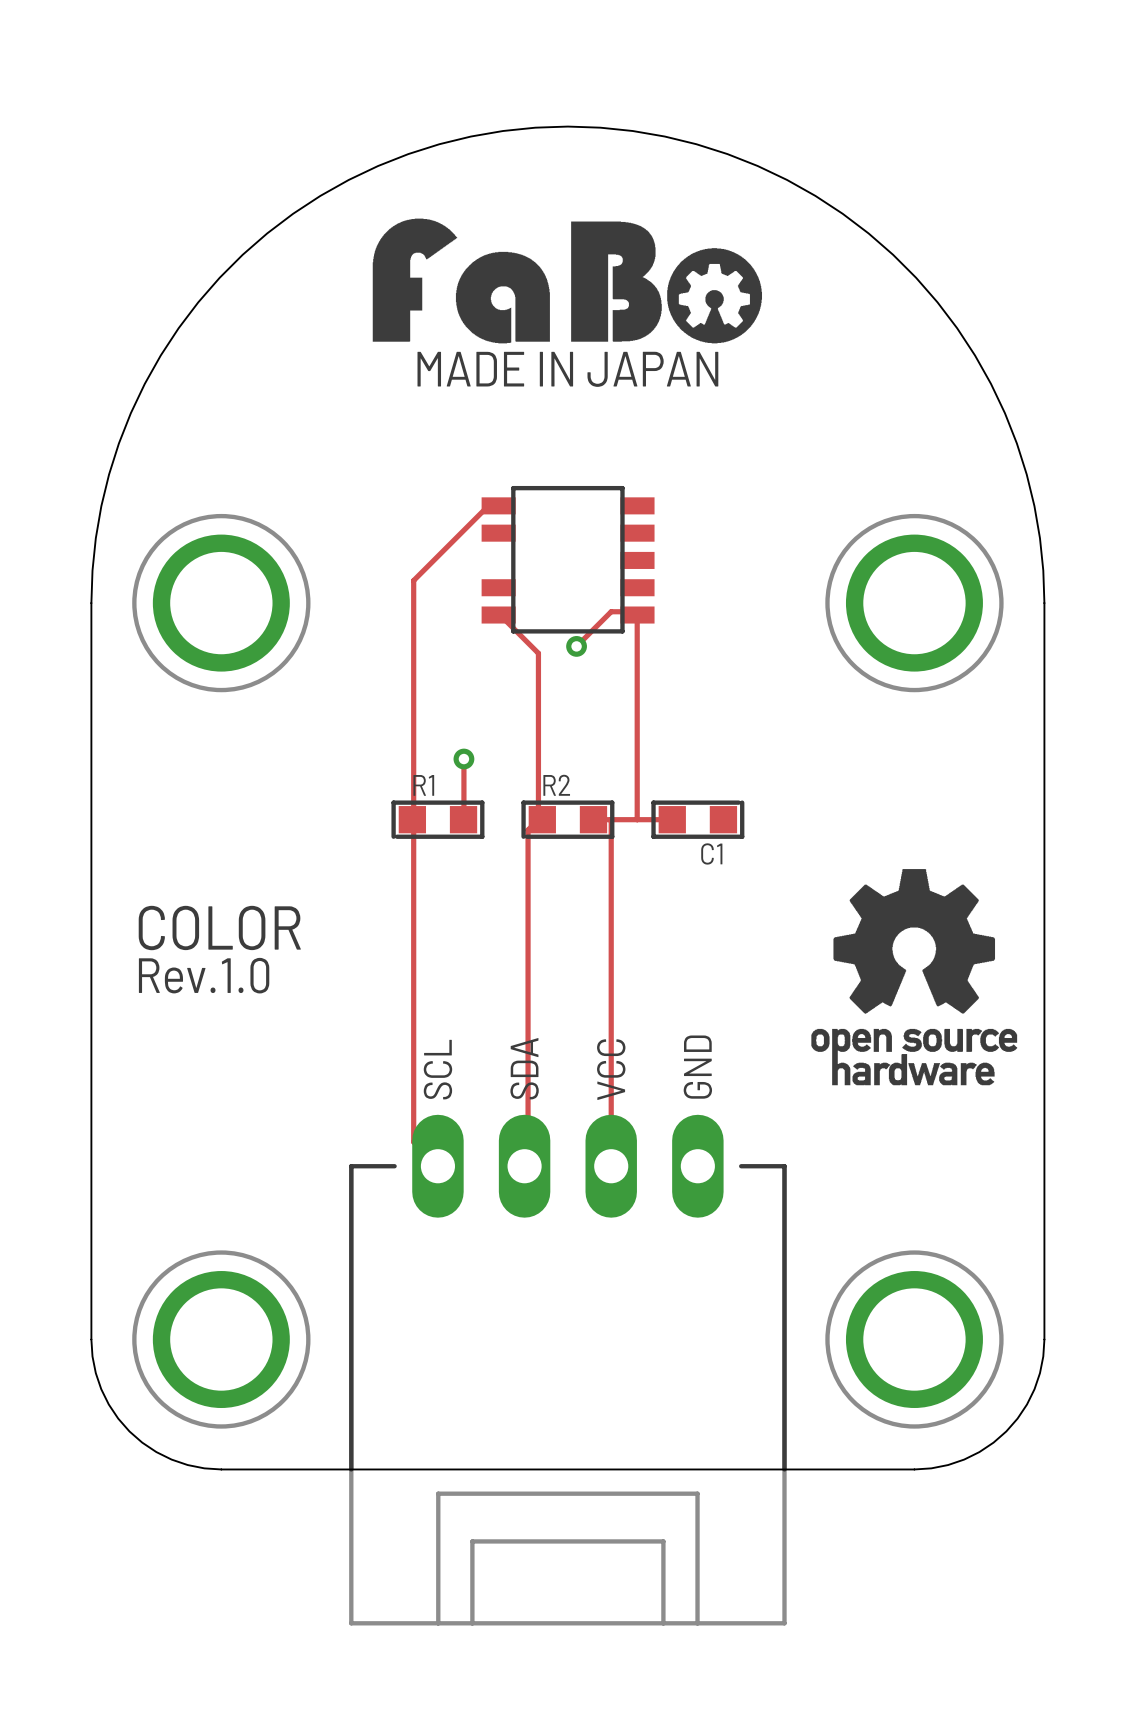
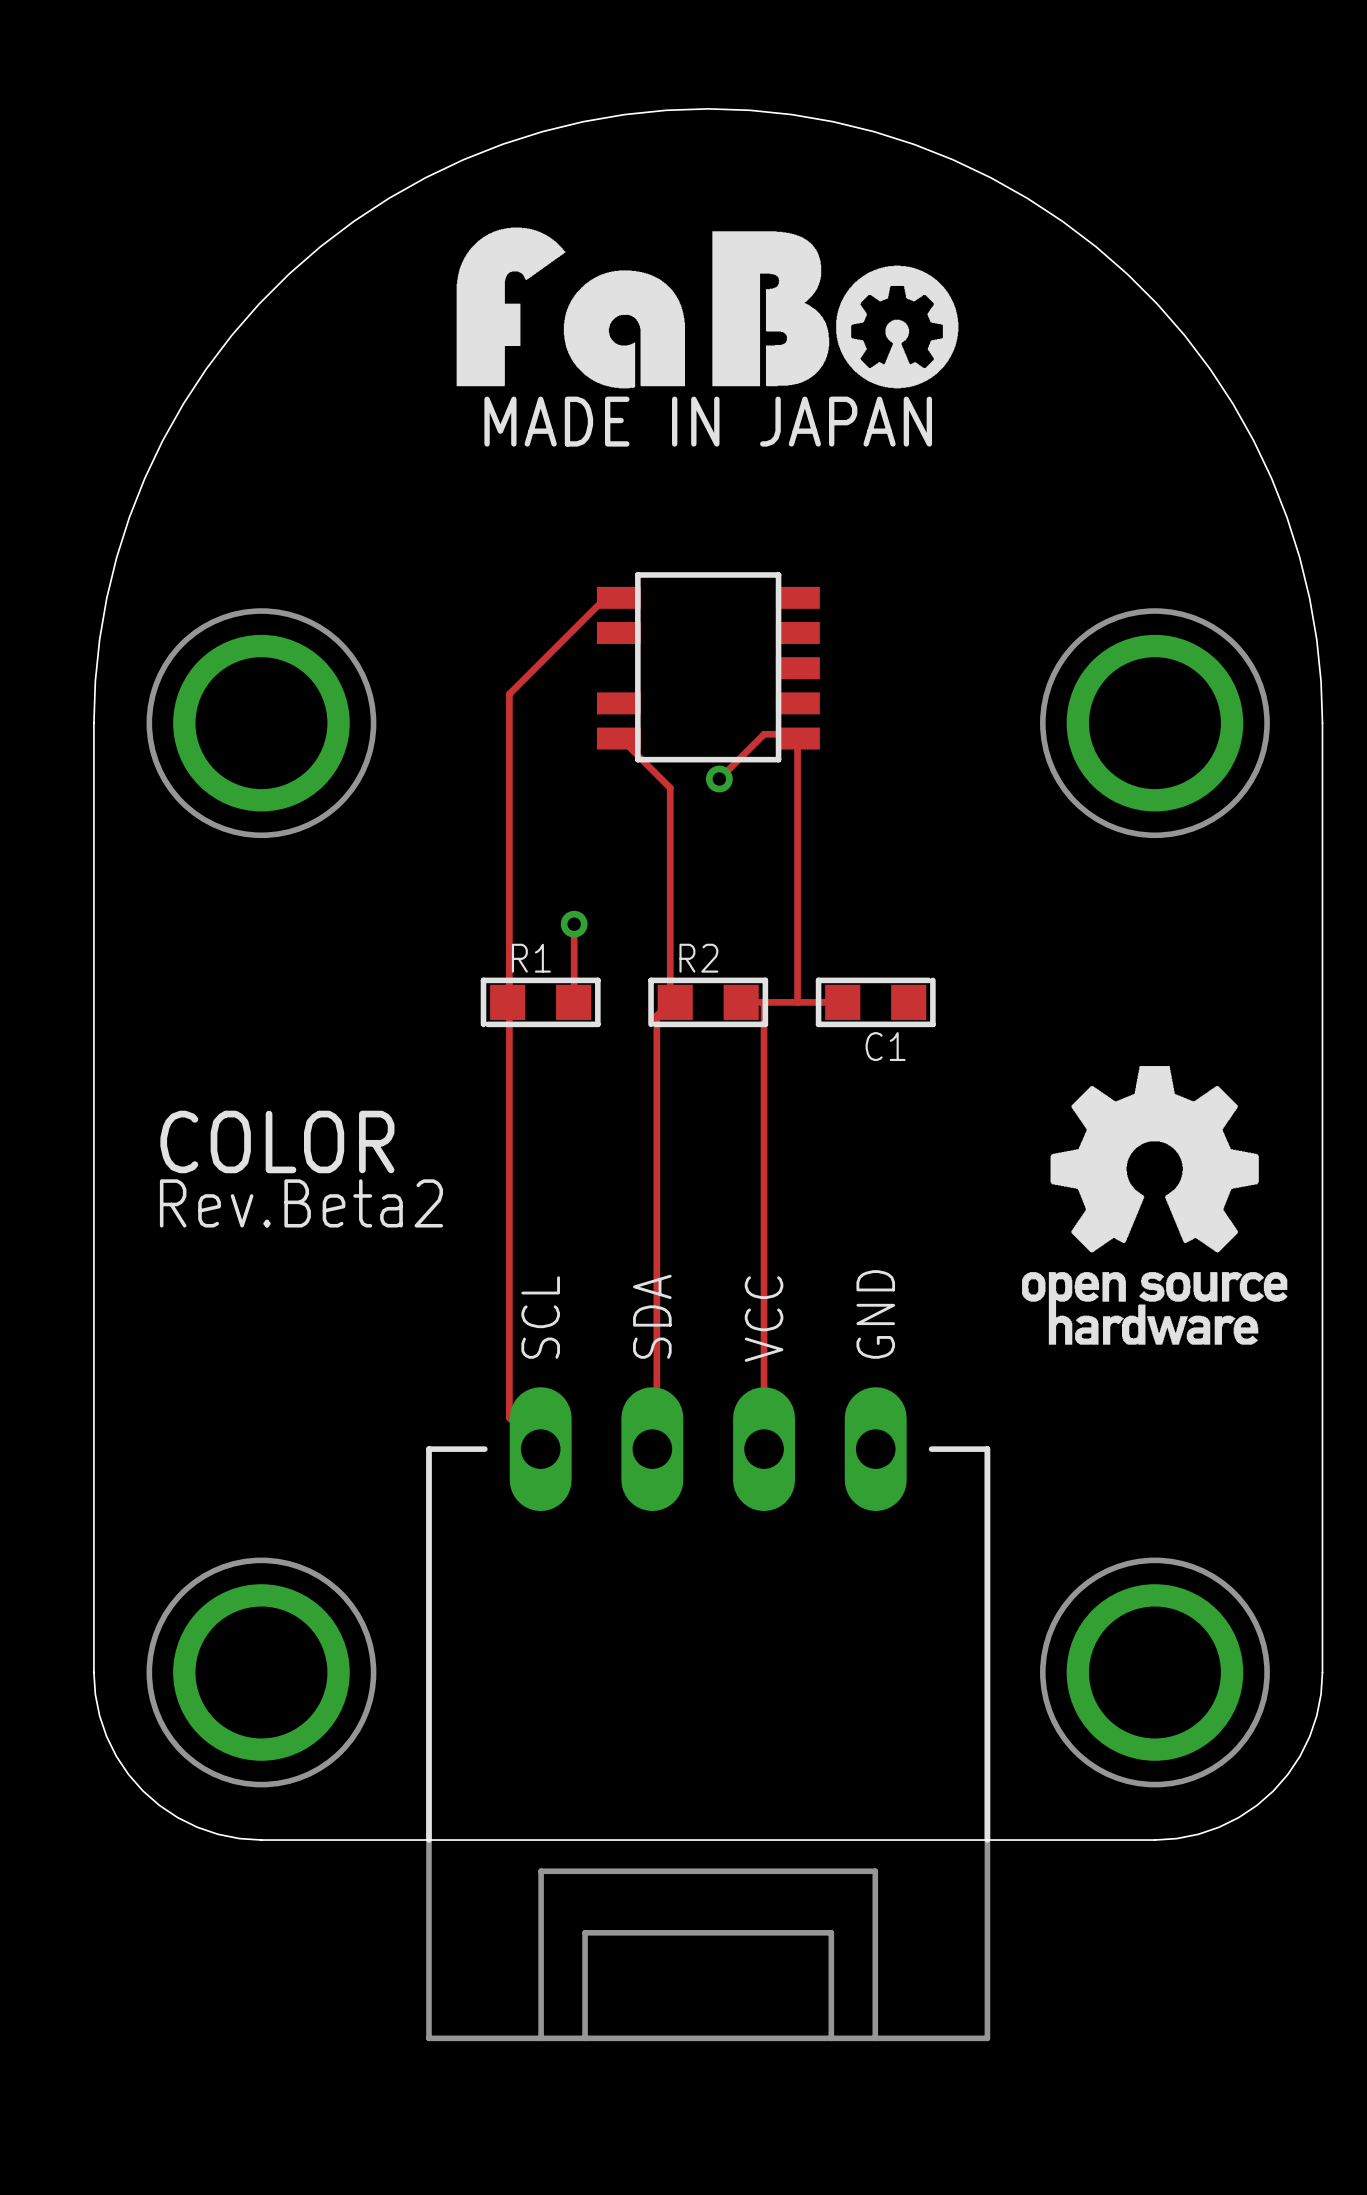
part footprint: [91, 126, 1045, 1626] -> [93, 108, 1323, 2042]
text: Rev.1.0 (204, 975) -> Rev.Beta2 (301, 1203)

